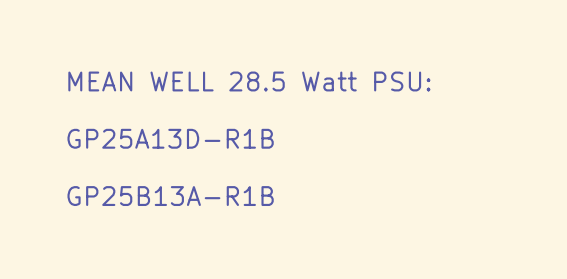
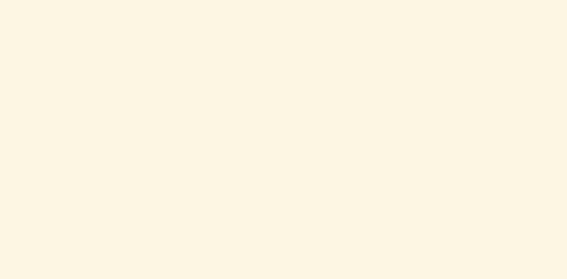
text: MEAN WELL 28.5 Watt PSU: (249, 81) -> none
text: GP25A13D-R1B (170, 138) -> none
text: GP25B13A-R1B (170, 196) -> none

